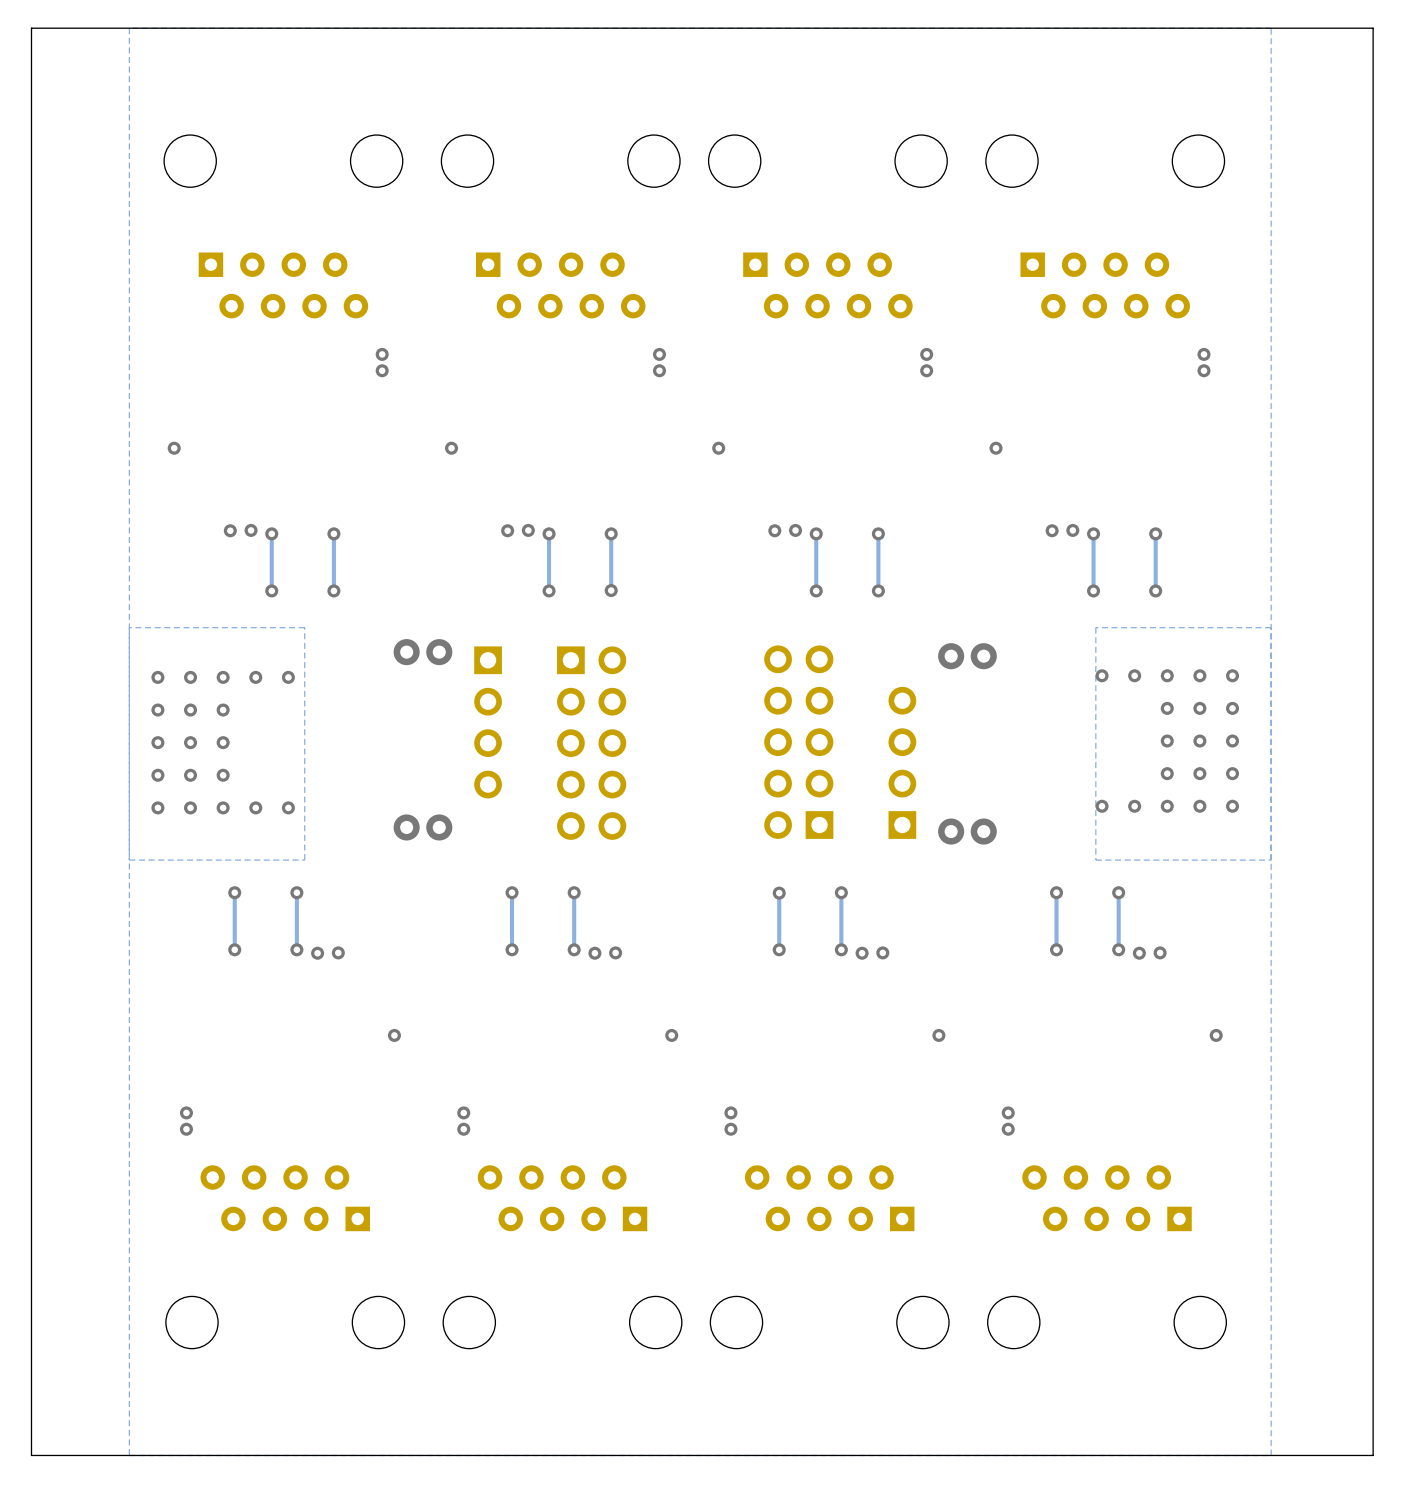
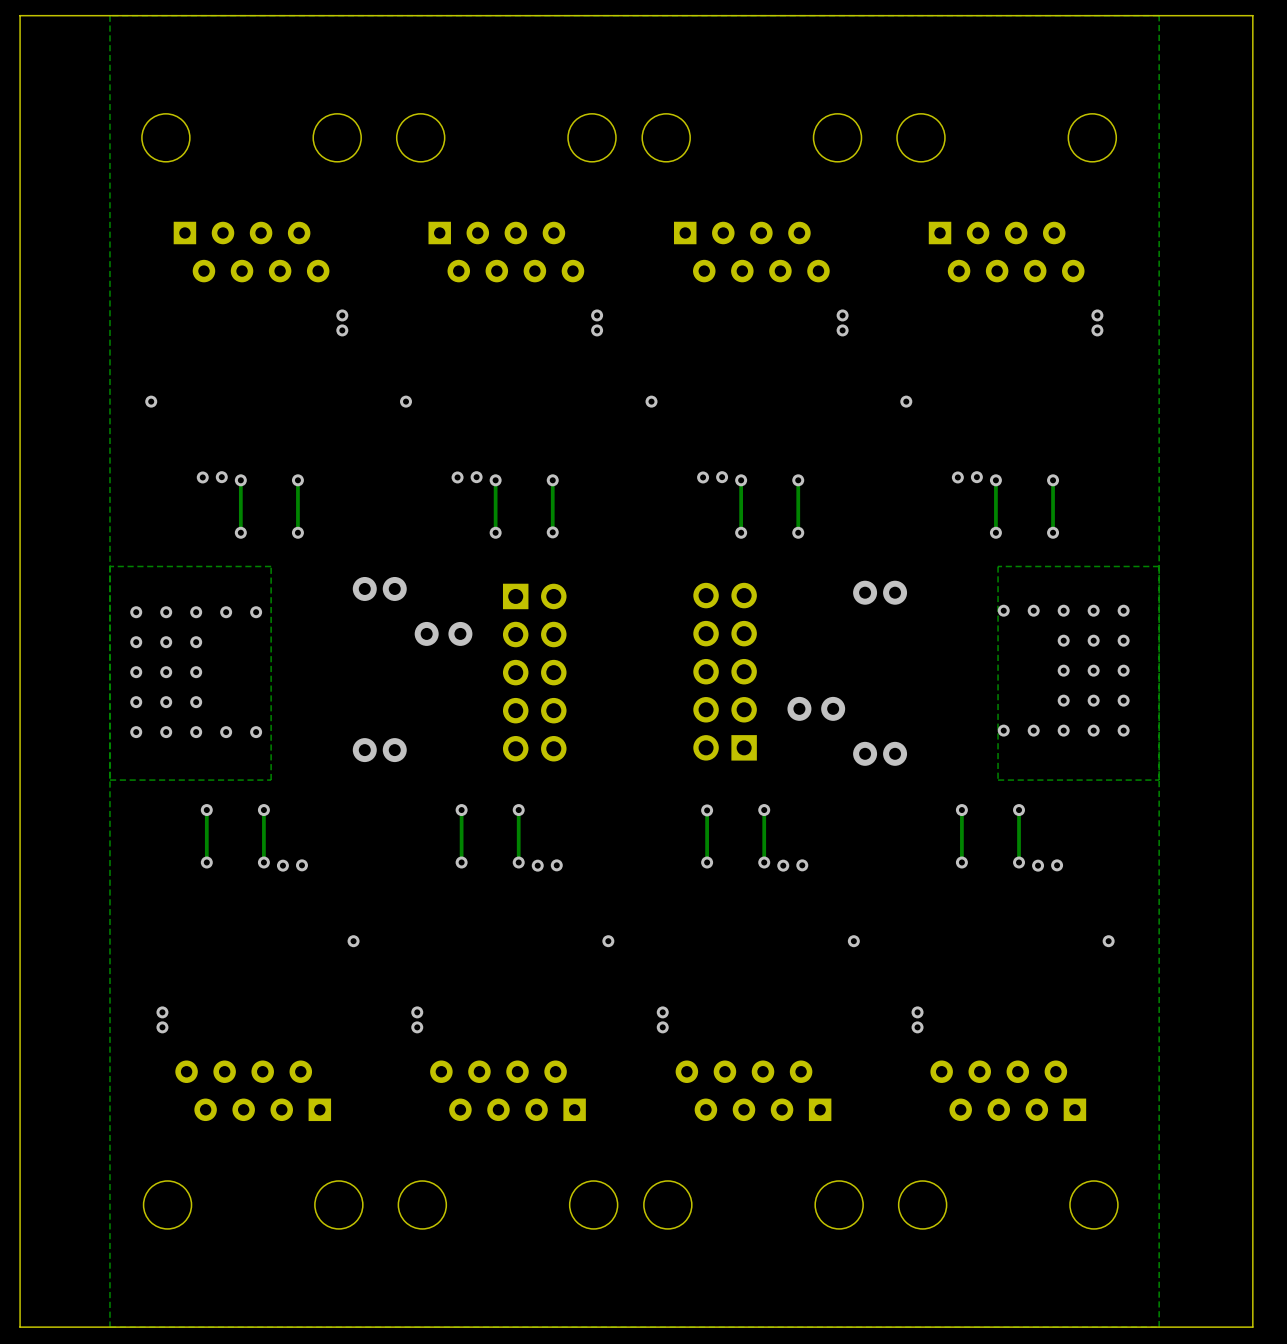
via: none -> (426, 633)
via: none -> (460, 633)
part: (488, 722) -> none
part: (902, 762) -> none
via: none -> (799, 708)
via: none -> (833, 708)

